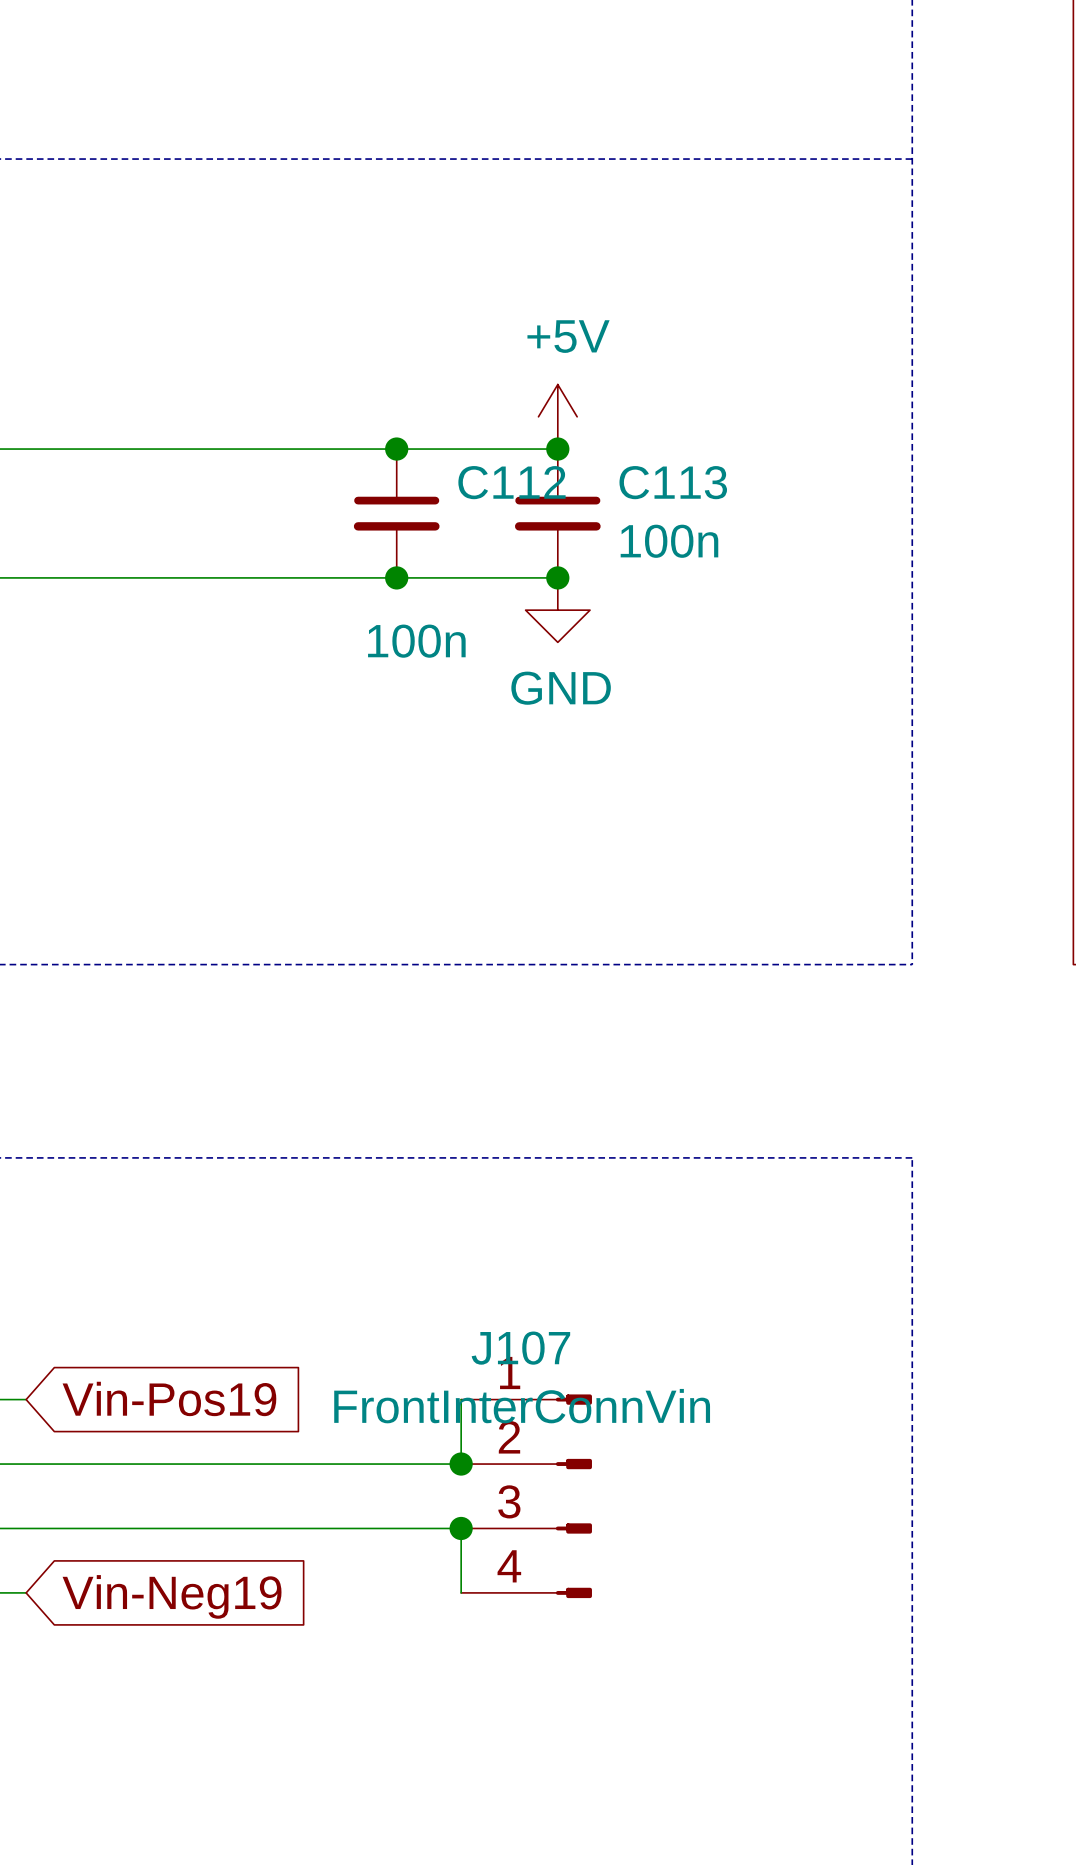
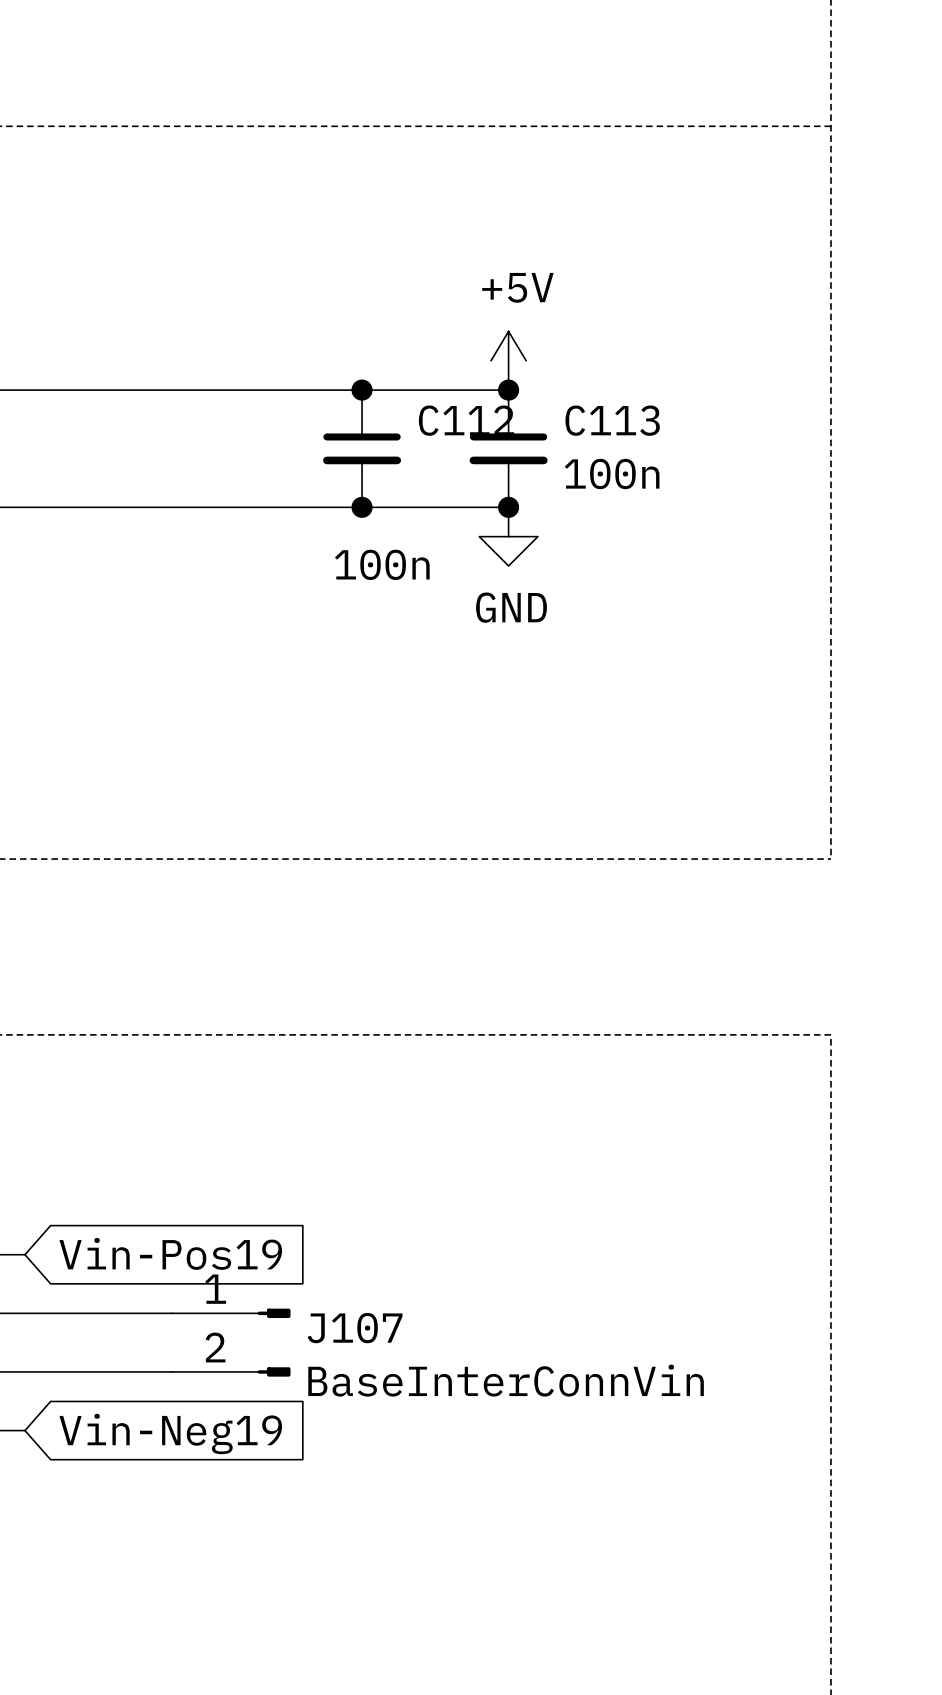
J107 name position: J107 (520, 1348) -> J107 (355, 1328)
J107 symbol: [461, 1394, 592, 1599] -> [171, 1308, 291, 1377]
wire: (461, 1399) (461, 1464) (187, 1464) -> none
J107 value: FrontInterConnVin (522, 1406) -> BaseInterConnVin (506, 1380)
junction: (461, 1464) -> none
wire: (187, 1528) (461, 1528) (461, 1592) -> none
junction: (461, 1528) -> none

